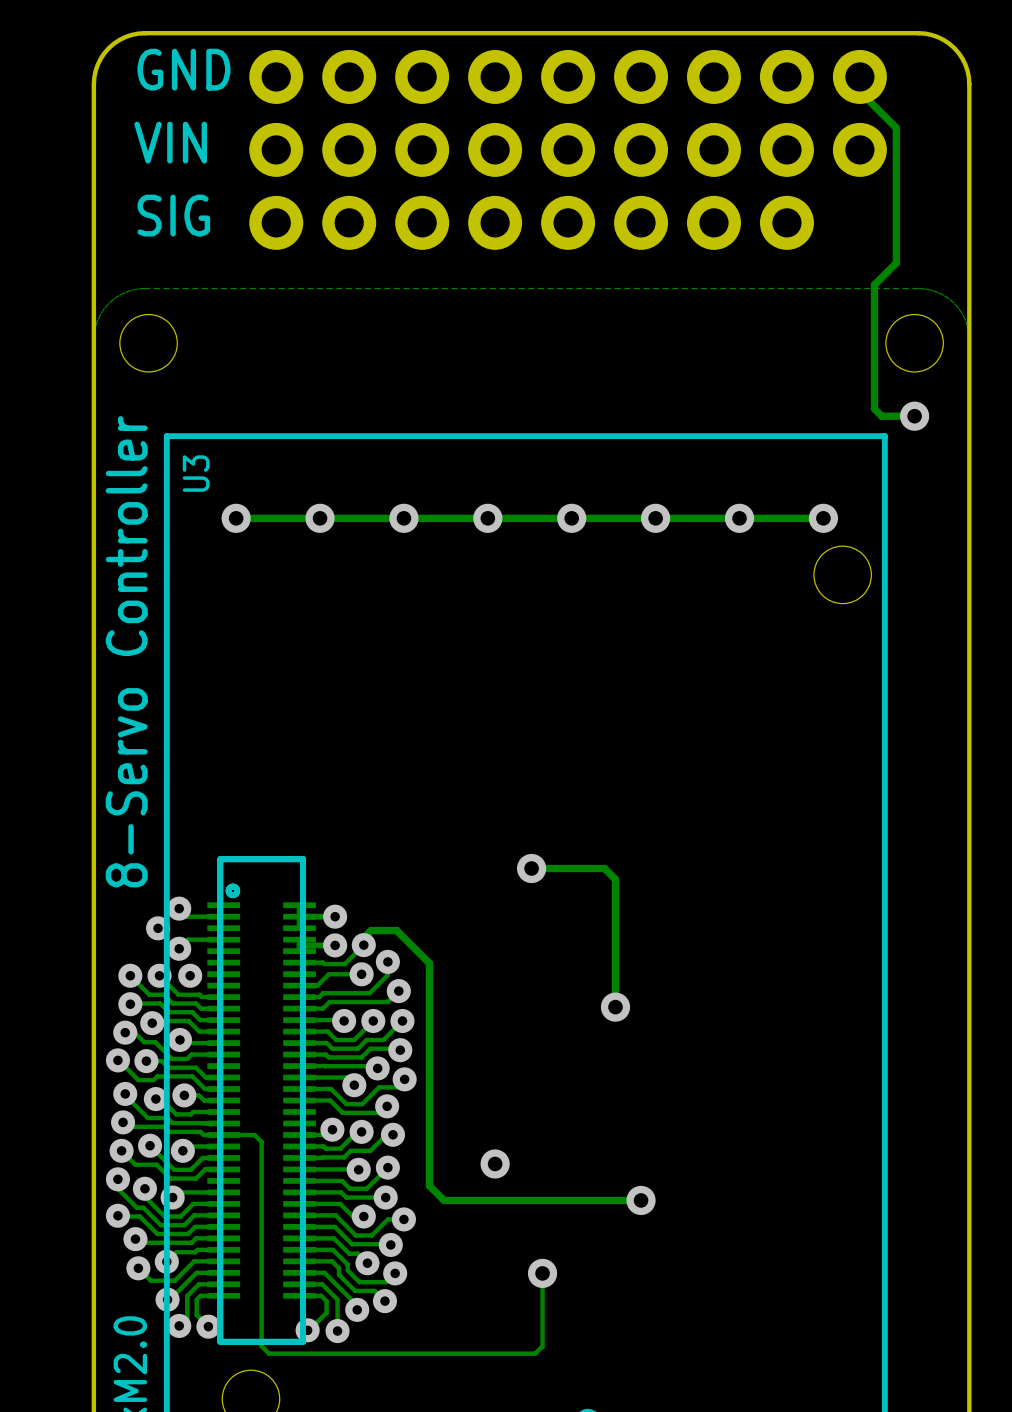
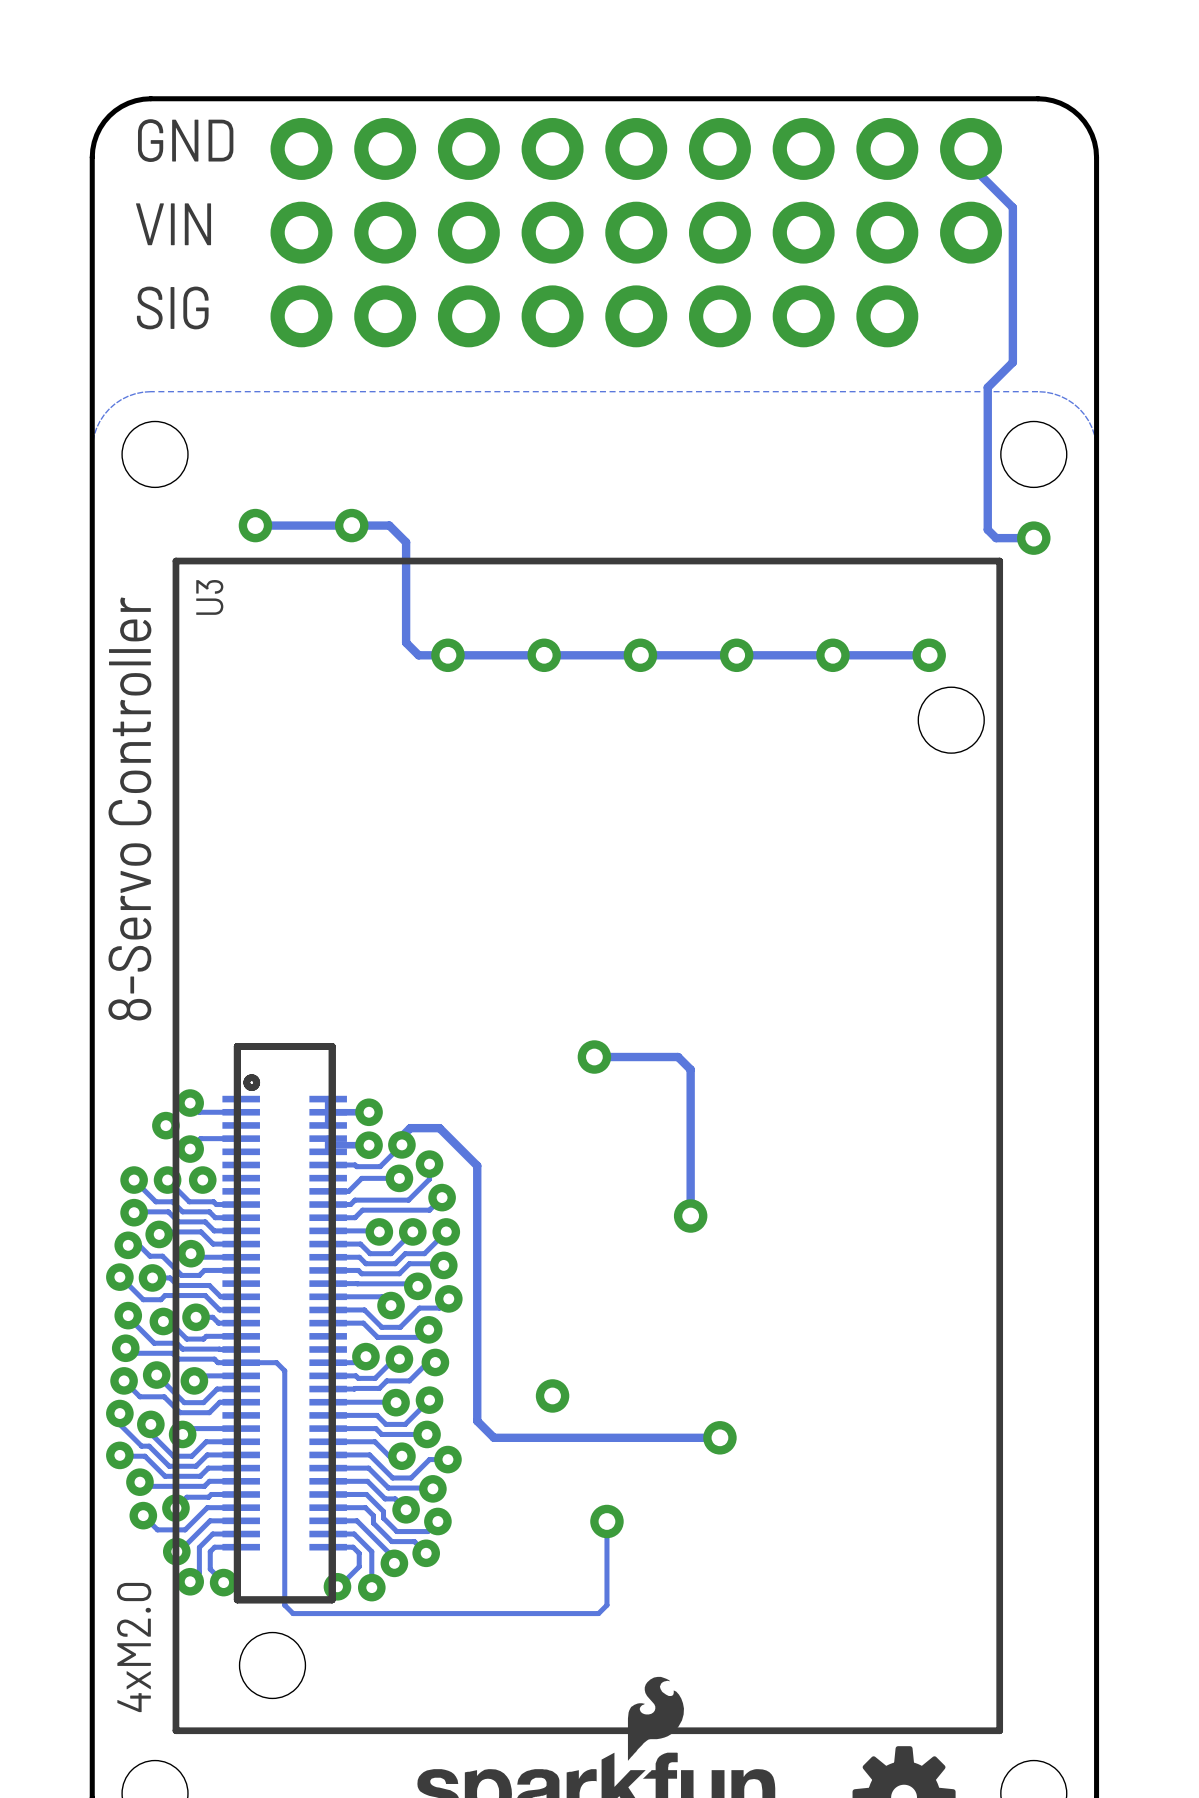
via: none -> (255, 525)
via: none -> (351, 525)
via: (236, 518) -> none
via: (320, 518) -> none
track: (378, 518) (236, 518) -> (418, 655) (406, 642) (406, 542) (389, 525) (255, 525)

